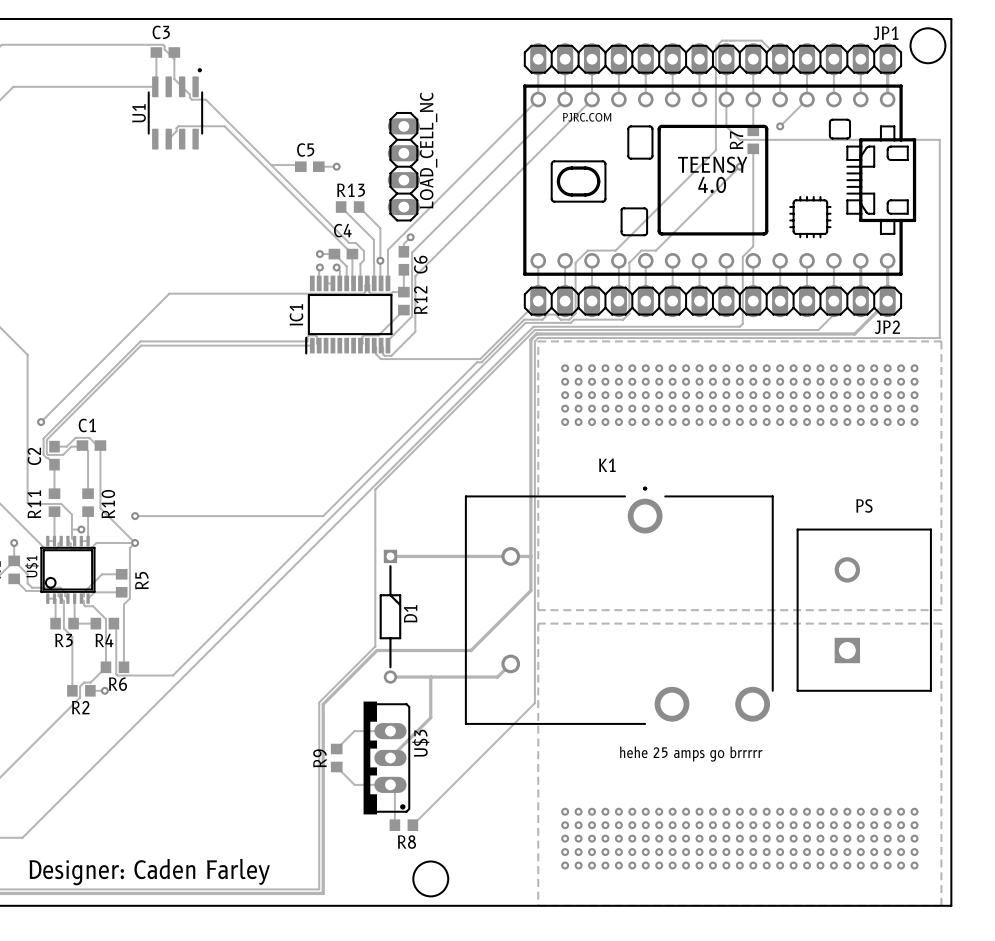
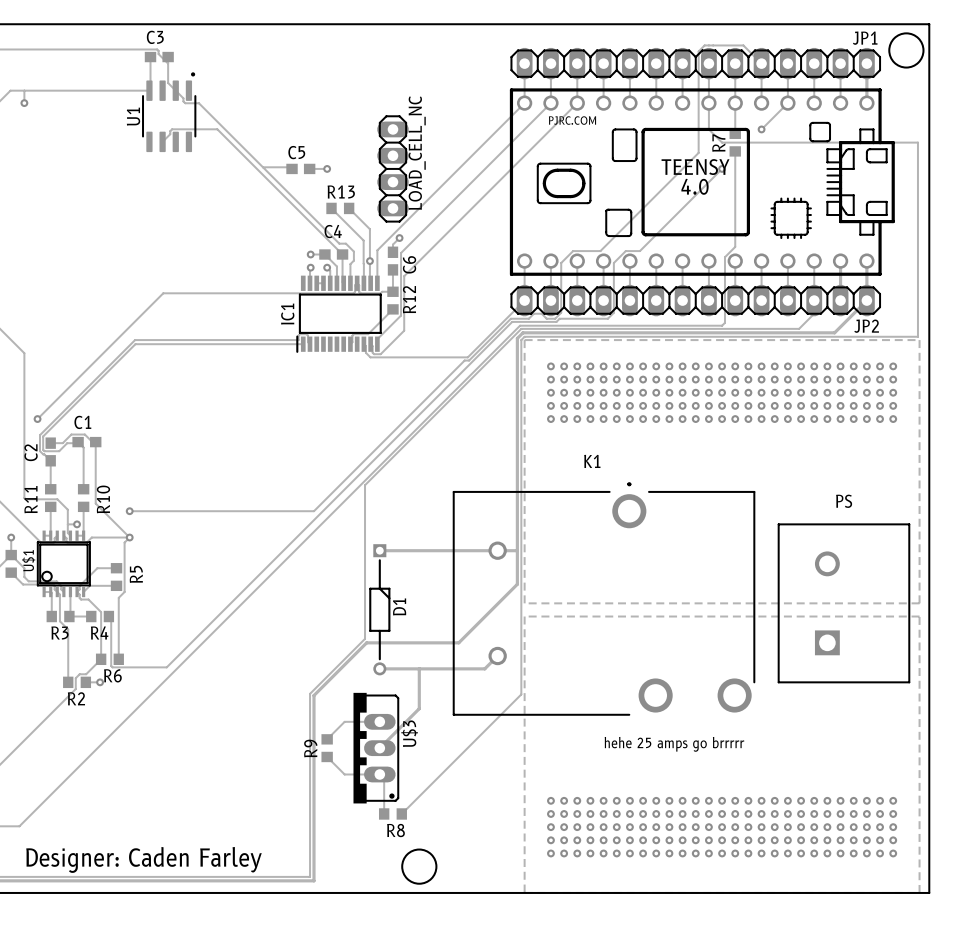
track: none -> (24, 90) (24, 103)
via: none -> (24, 103)

